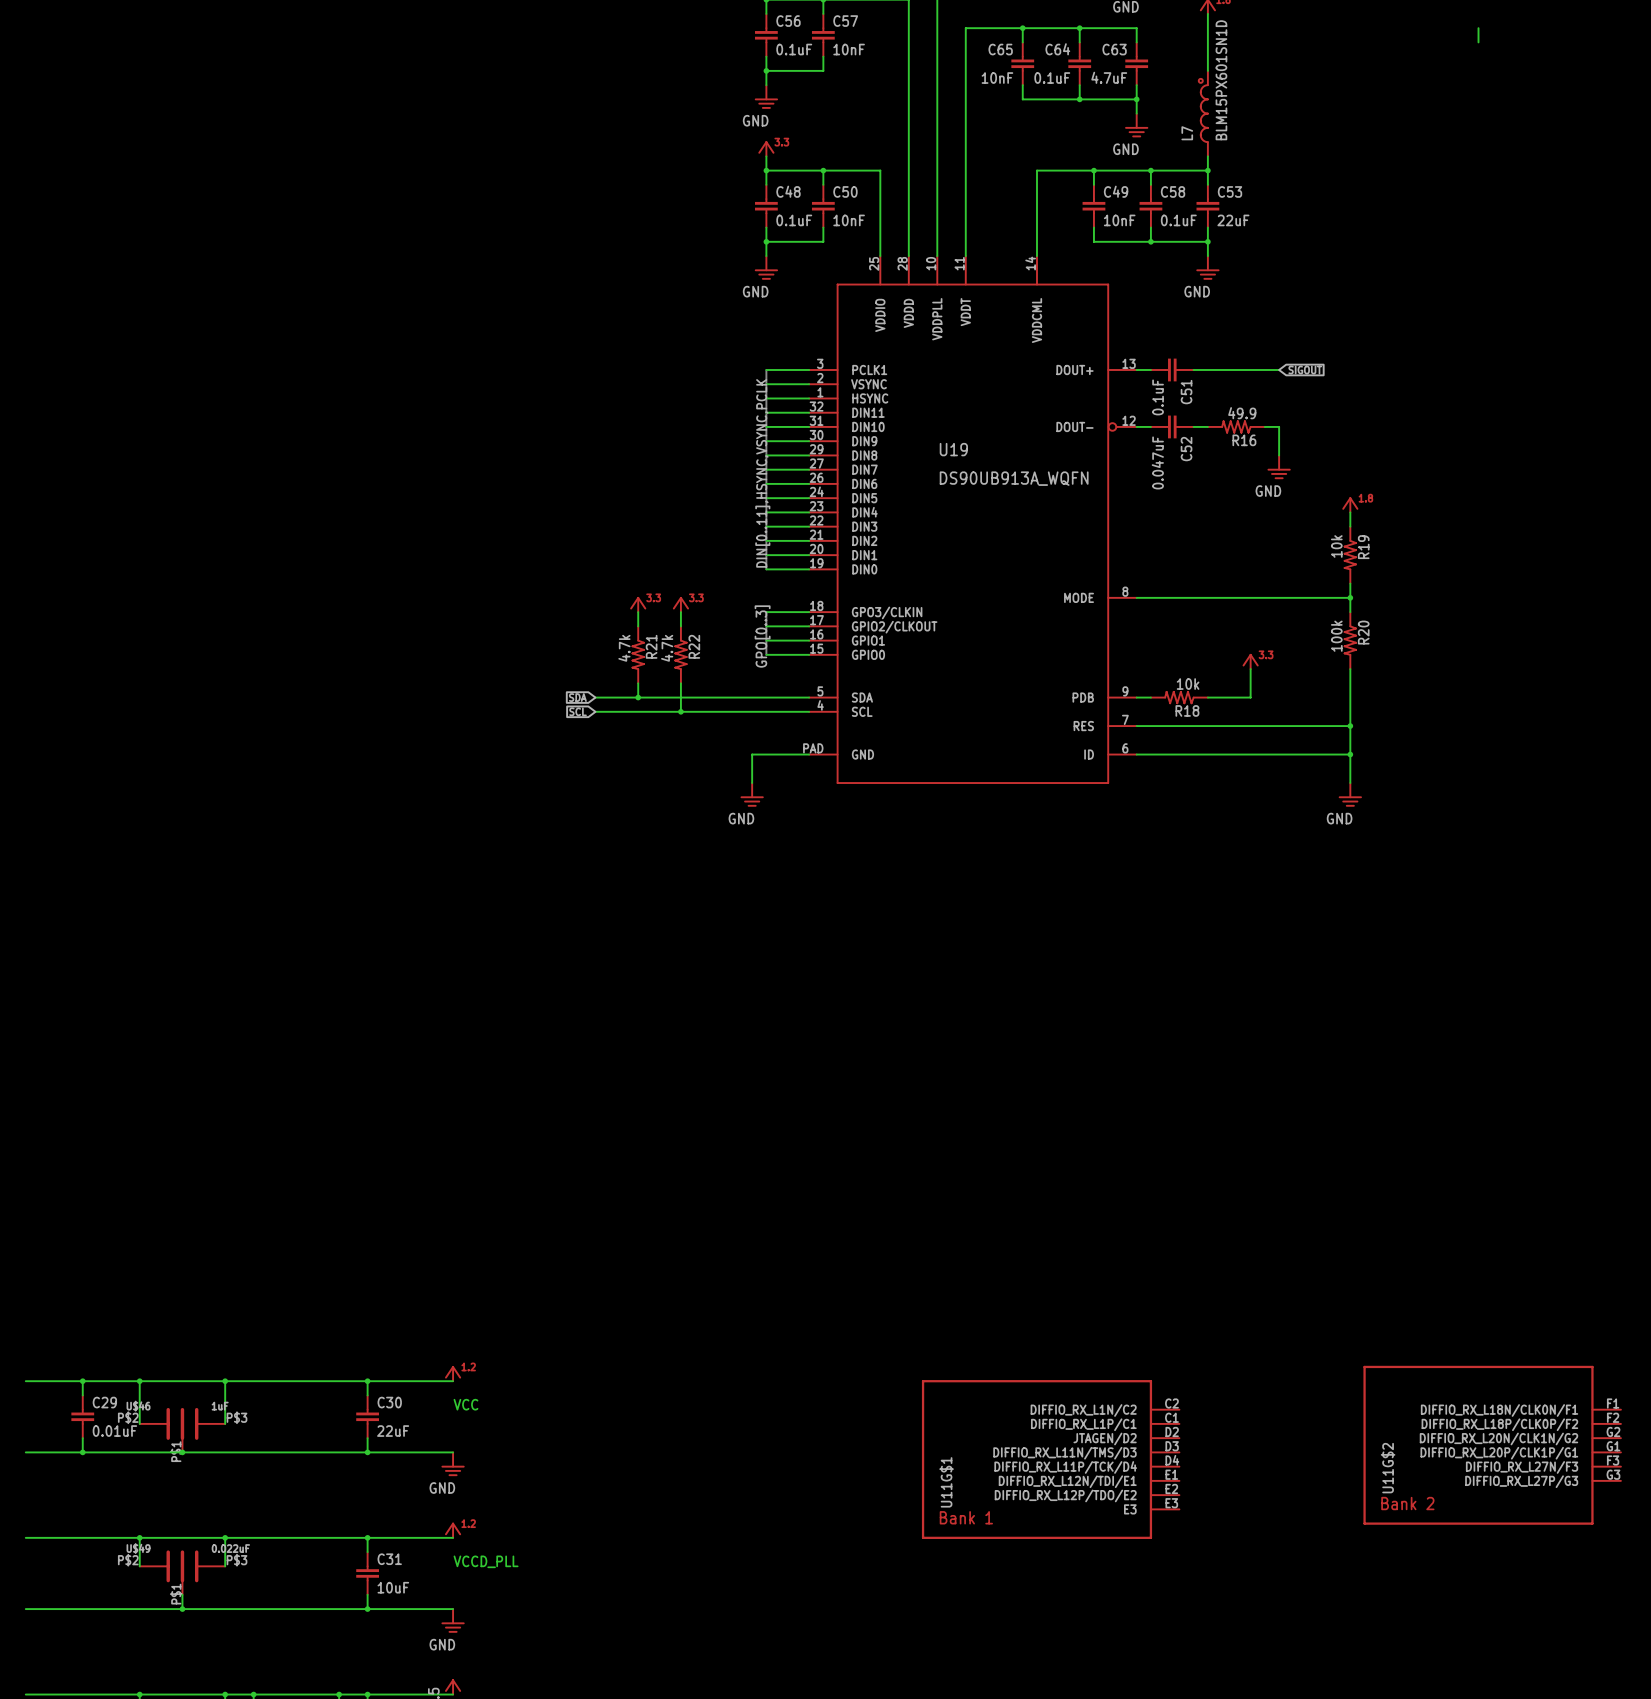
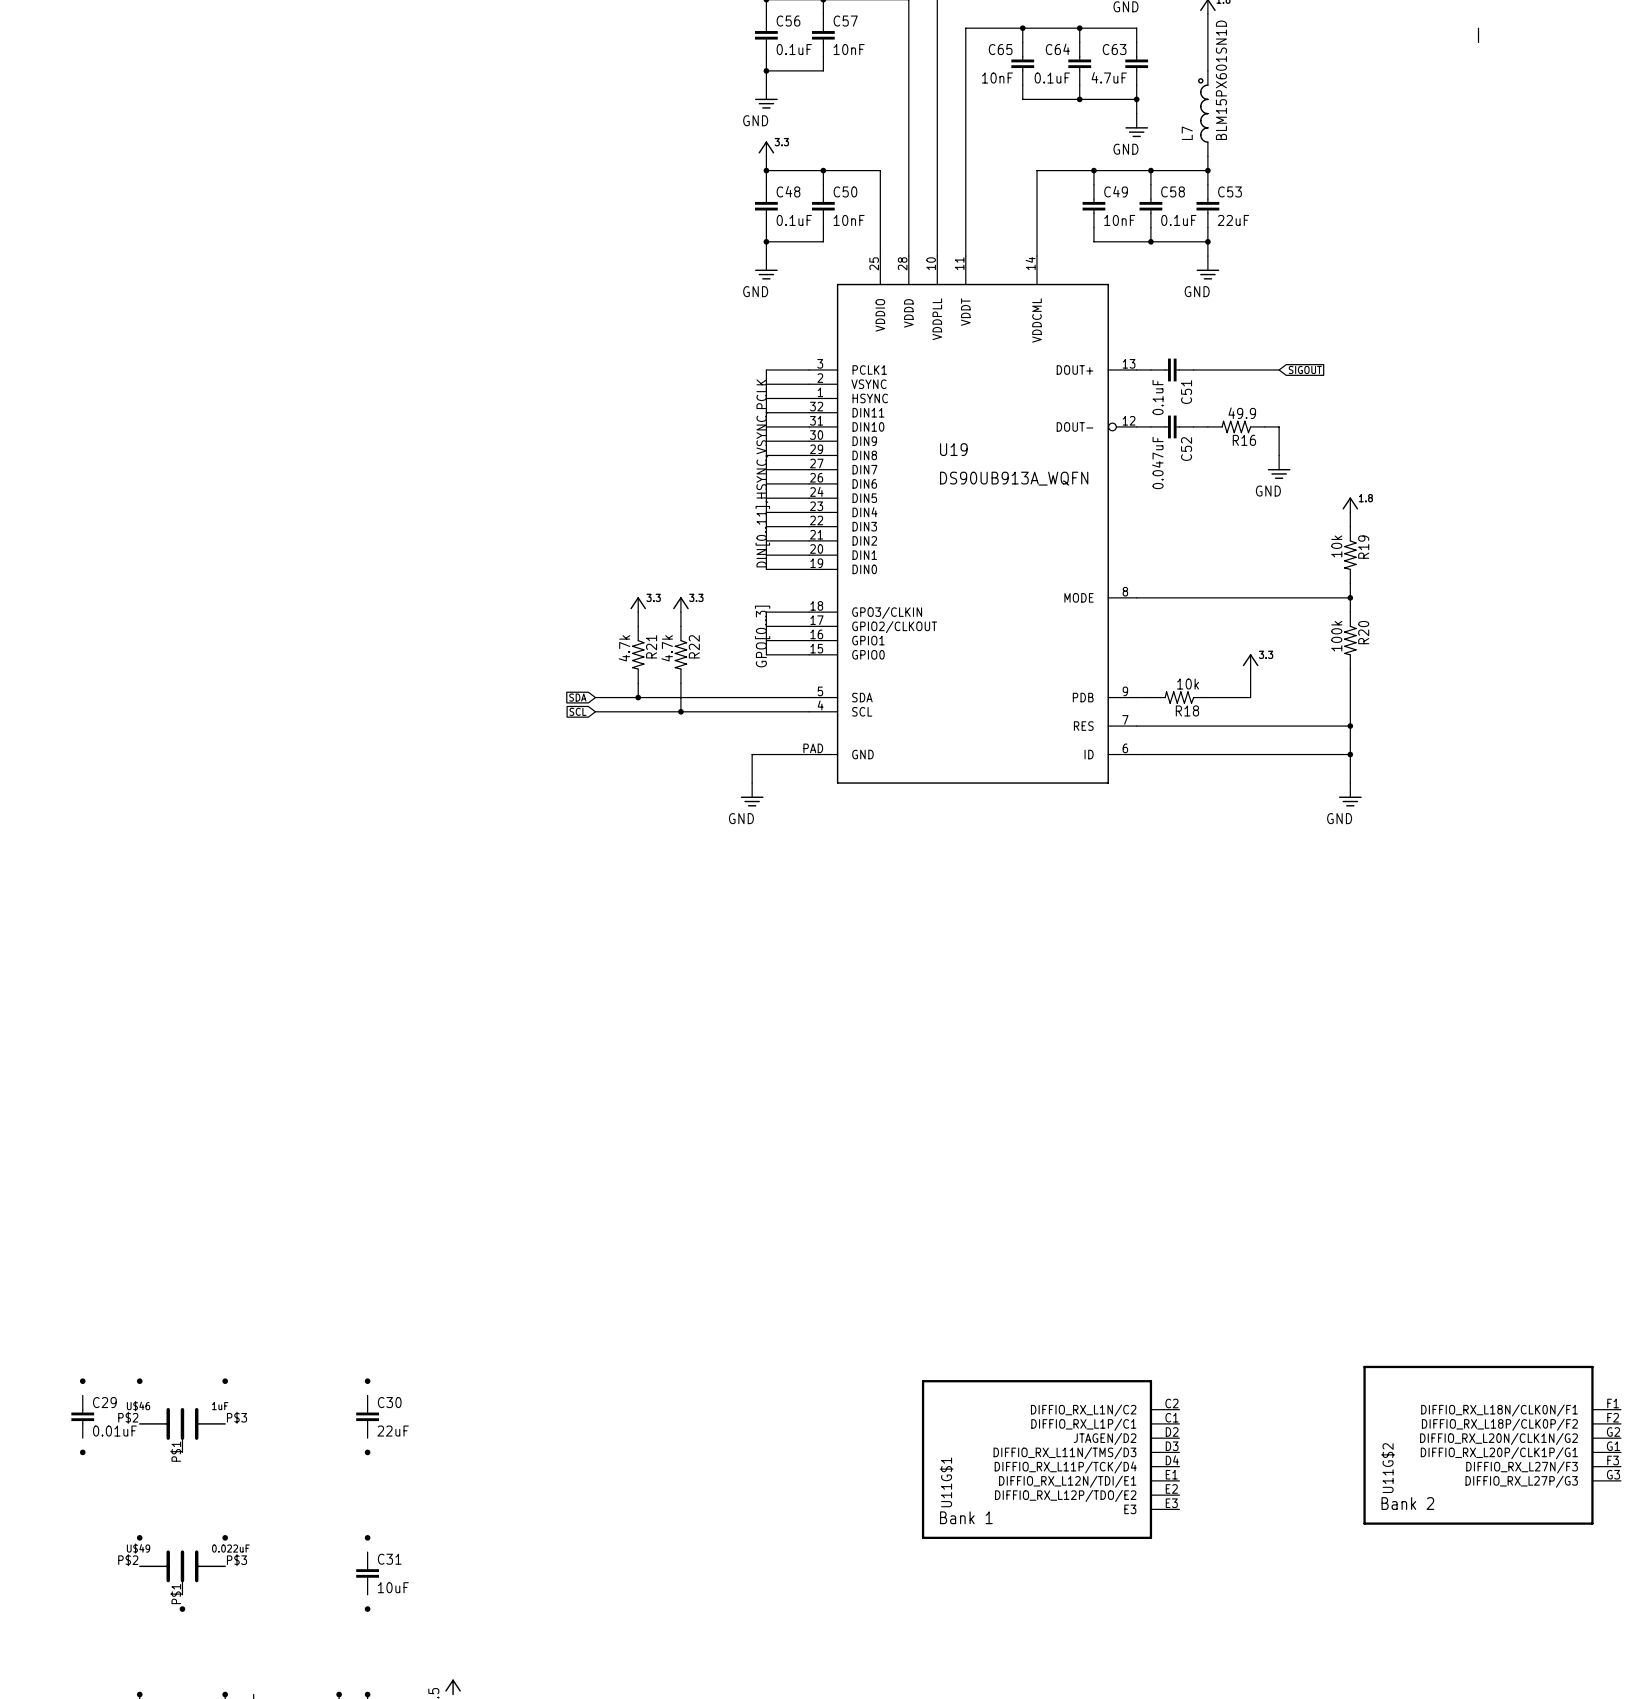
power symbol: (453, 1373) -> none
wire: (25, 1381) (453, 1381) -> none
wire: (82, 1381) (82, 1395) -> none
wire: (139, 1381) (139, 1423) -> none
wire: (225, 1381) (225, 1423) -> none
wire: (367, 1381) (367, 1395) -> none
text: VCC (465, 1404) -> none
wire: (82, 1438) (82, 1452) -> none
wire: (367, 1438) (367, 1452) -> none
wire: (25, 1452) (453, 1452) -> none
junction: (182, 1452) -> none
power symbol: GND (453, 1464) -> none
power symbol: (453, 1530) -> none
wire: (25, 1537) (453, 1537) -> none
wire: (139, 1537) (139, 1566) -> none
wire: (225, 1537) (225, 1566) -> none
wire: (367, 1537) (367, 1552) -> none
text: VCCD_PLL (486, 1561) -> none
wire: (182, 1594) (182, 1609) -> none
wire: (367, 1594) (367, 1609) -> none
wire: (25, 1609) (453, 1609) -> none
power symbol: GND (453, 1620) -> none
wire: (25, 1694) (453, 1694) -> none
junction: (253, 1694) -> none

